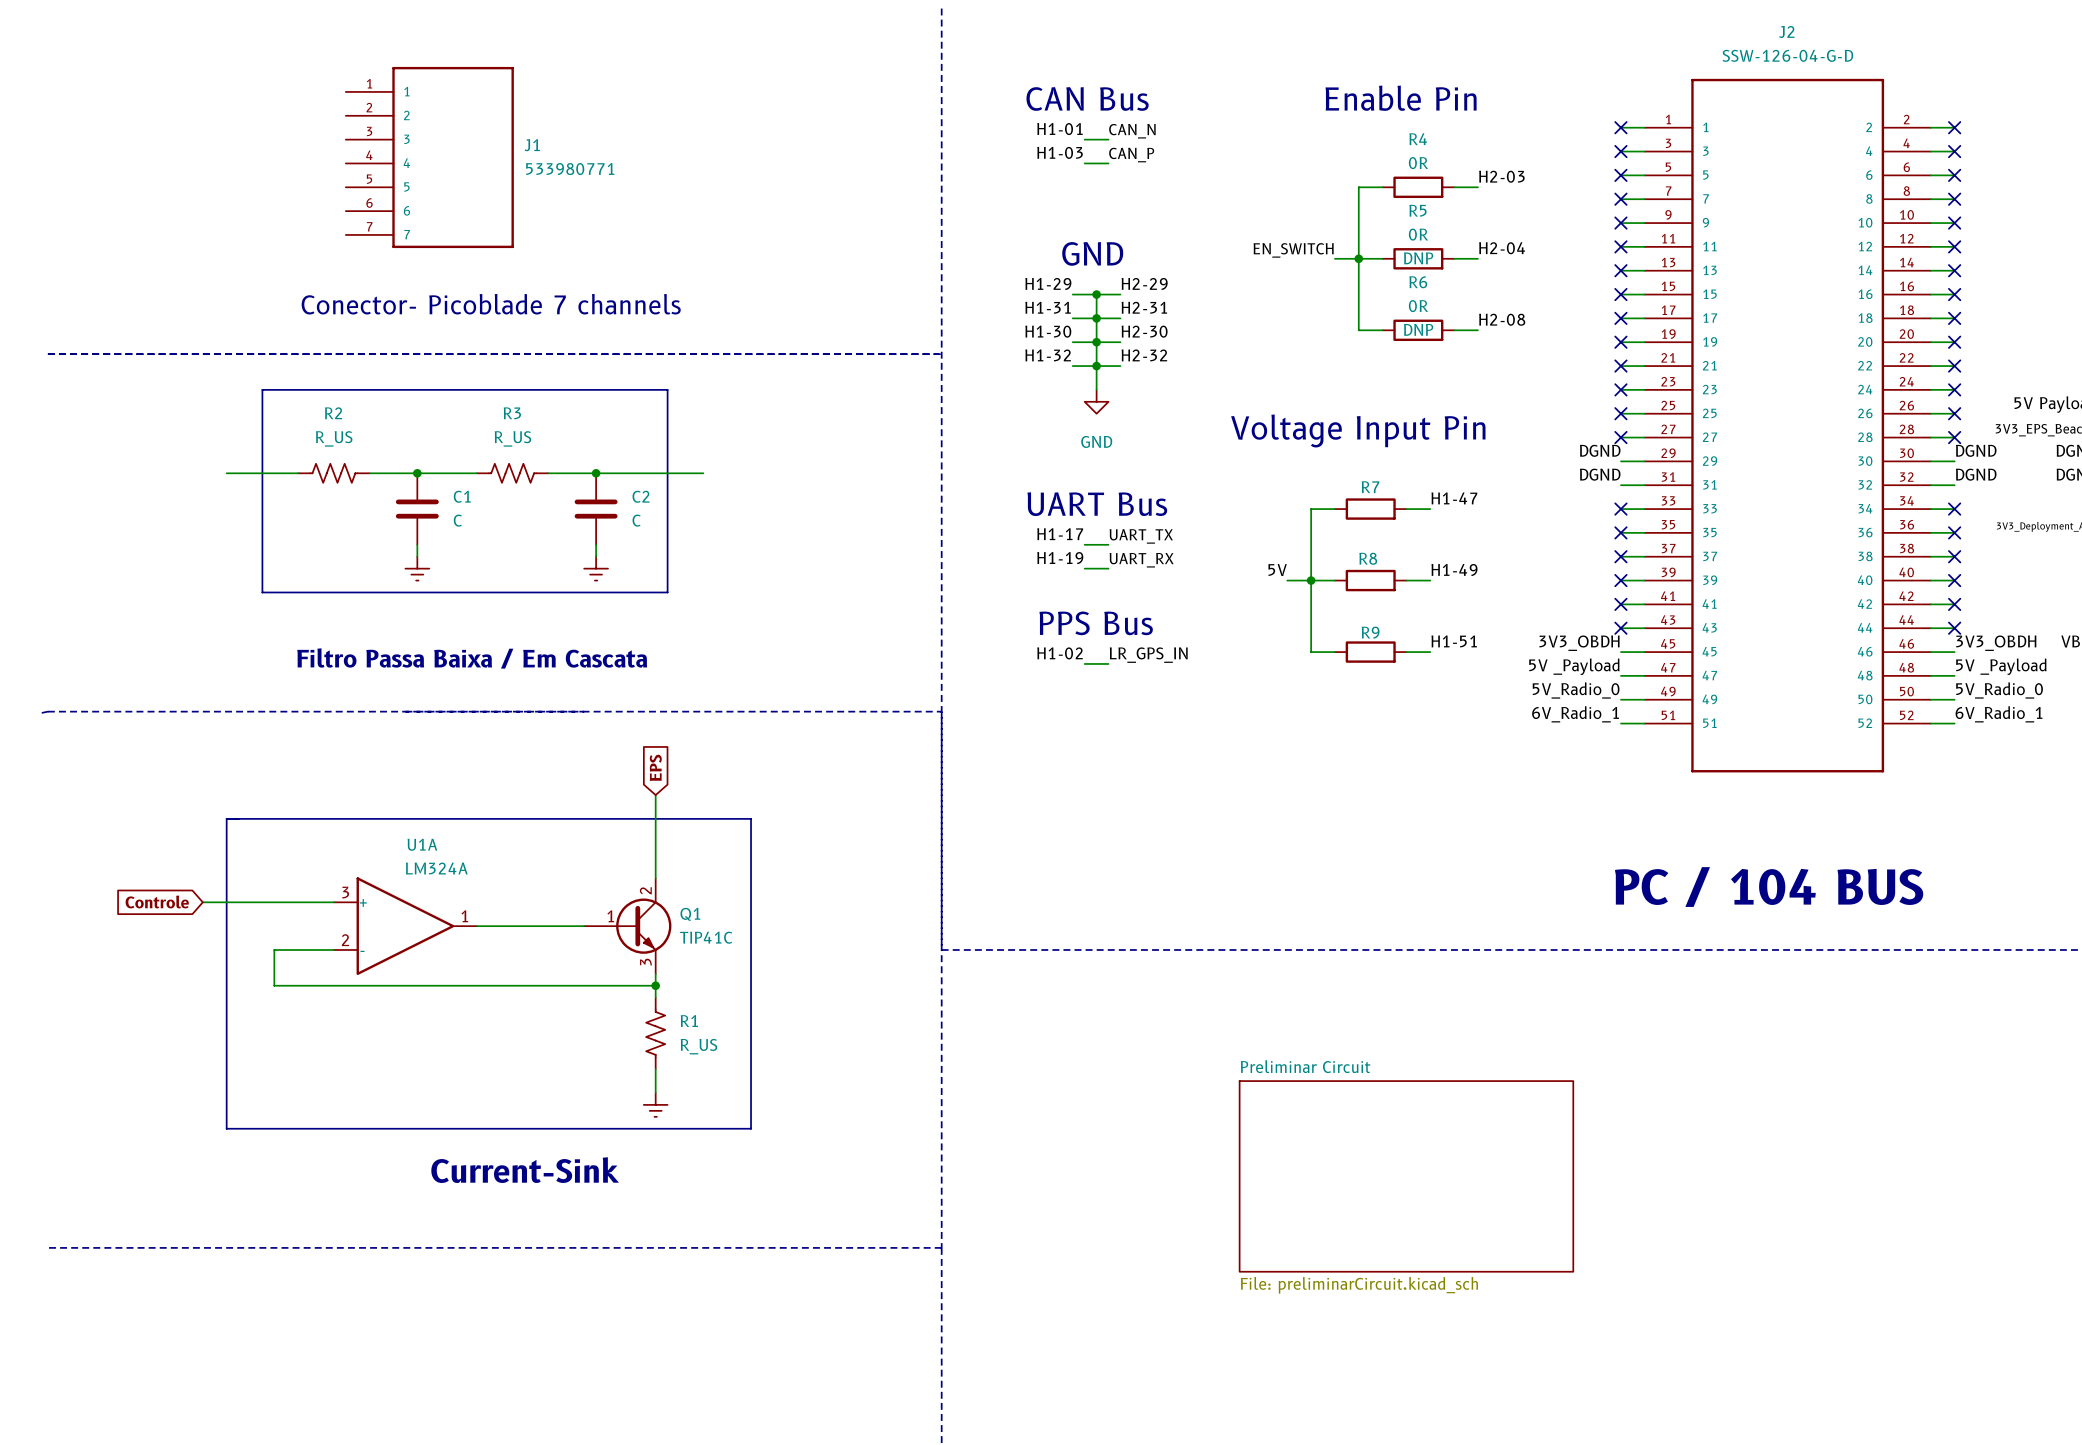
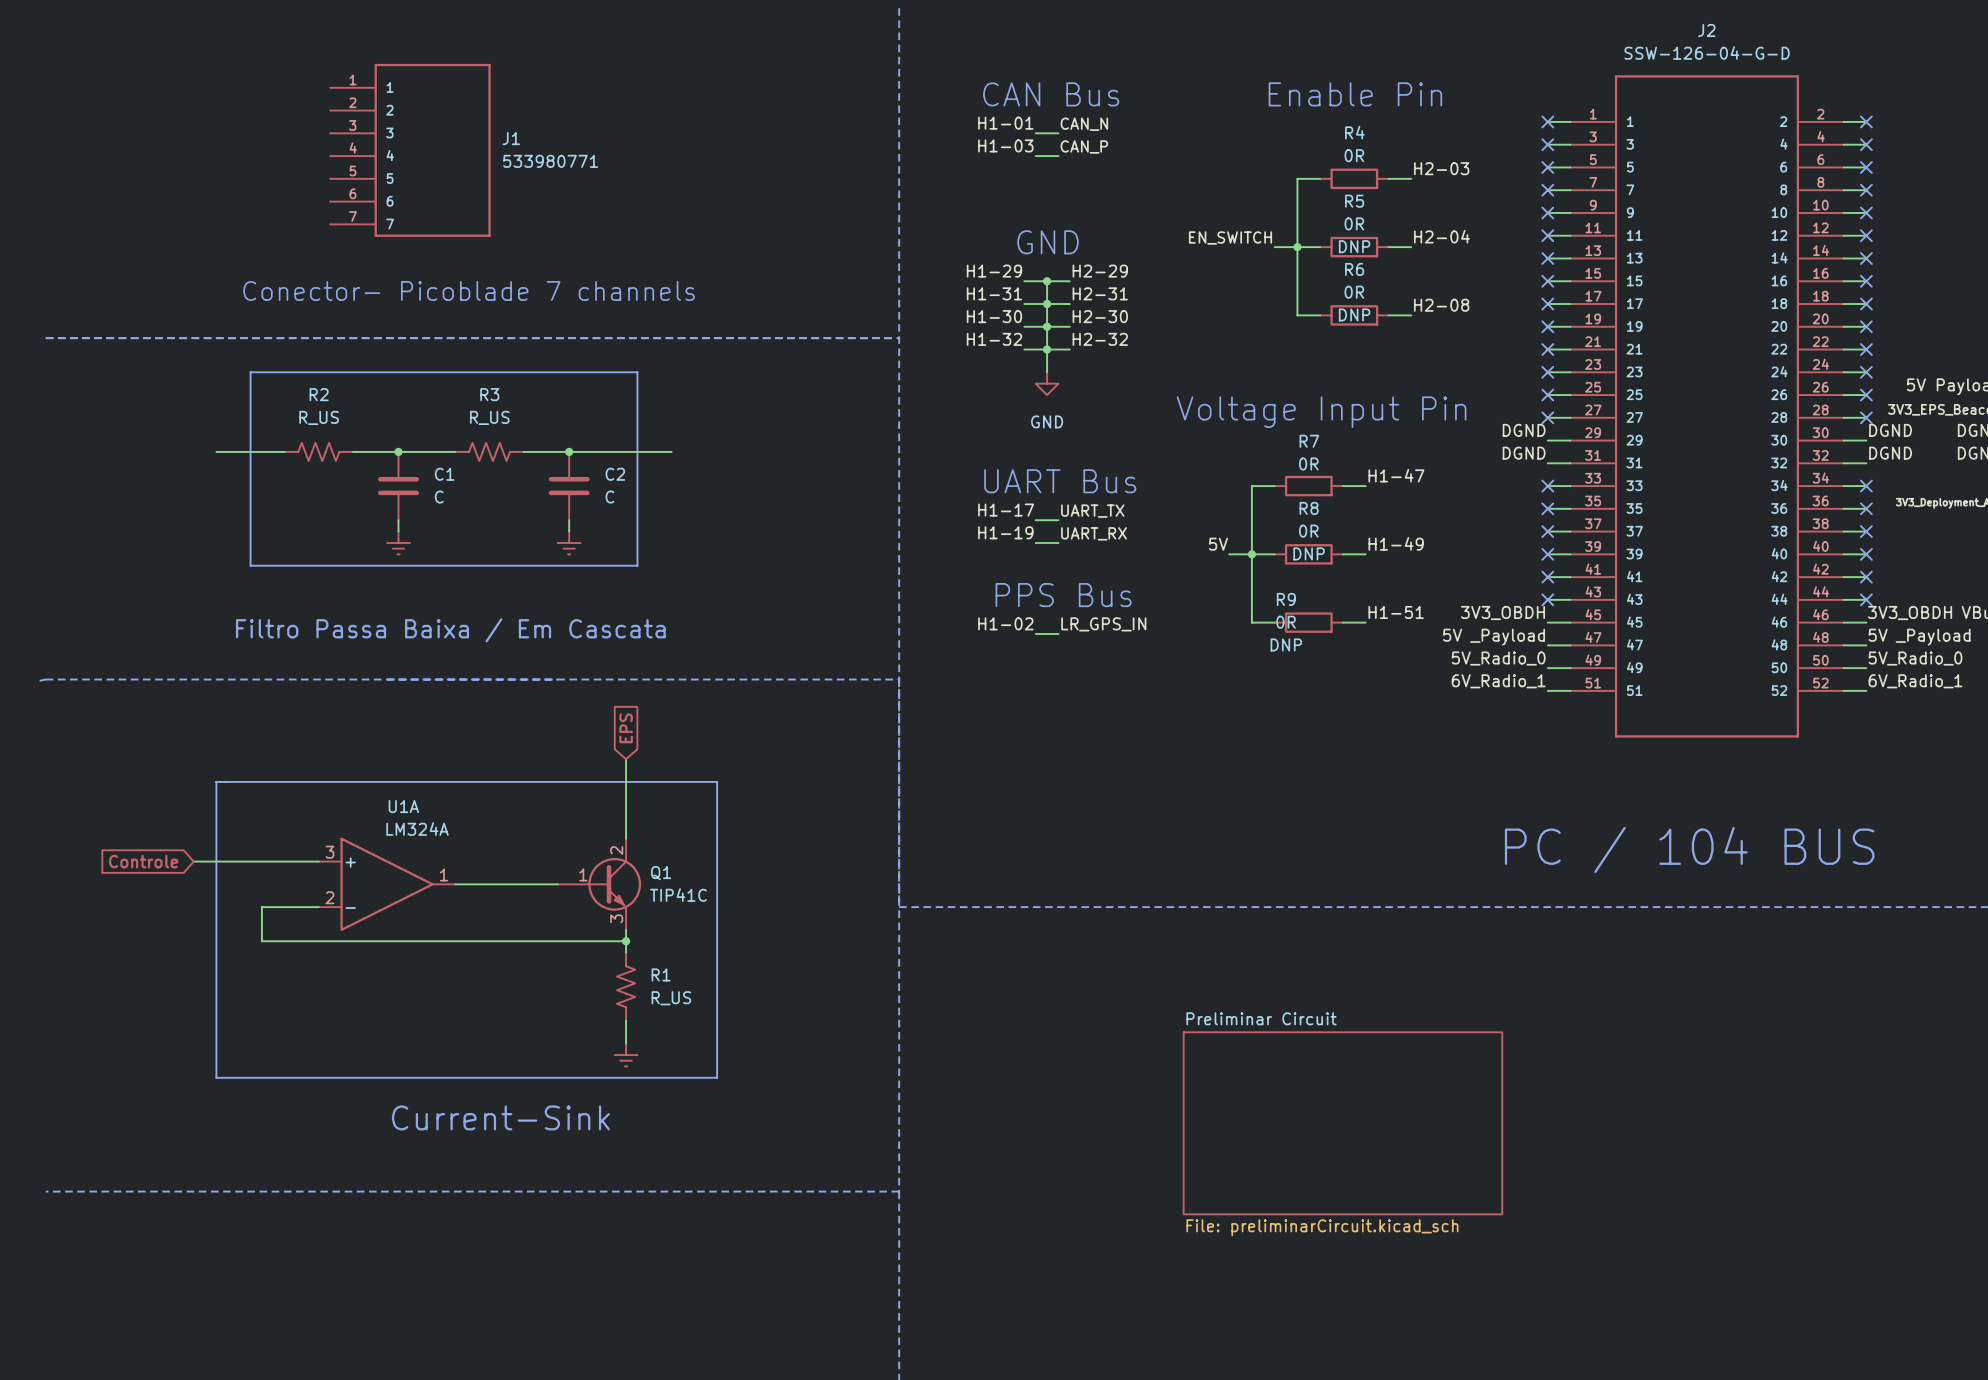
R7 value: none -> 0R (1308, 464)
R7 name position: R7 (1370, 487) -> R7 (1309, 441)
R8 value: none -> 0R (1308, 531)
R8 name position: R8 (1368, 558) -> R8 (1309, 508)
R8 text: none -> DNP (1309, 553)
R9 name position: R9 (1370, 632) -> R9 (1286, 599)
R9 value: none -> 0R (1286, 622)
R9 text: none -> DNP (1286, 644)

